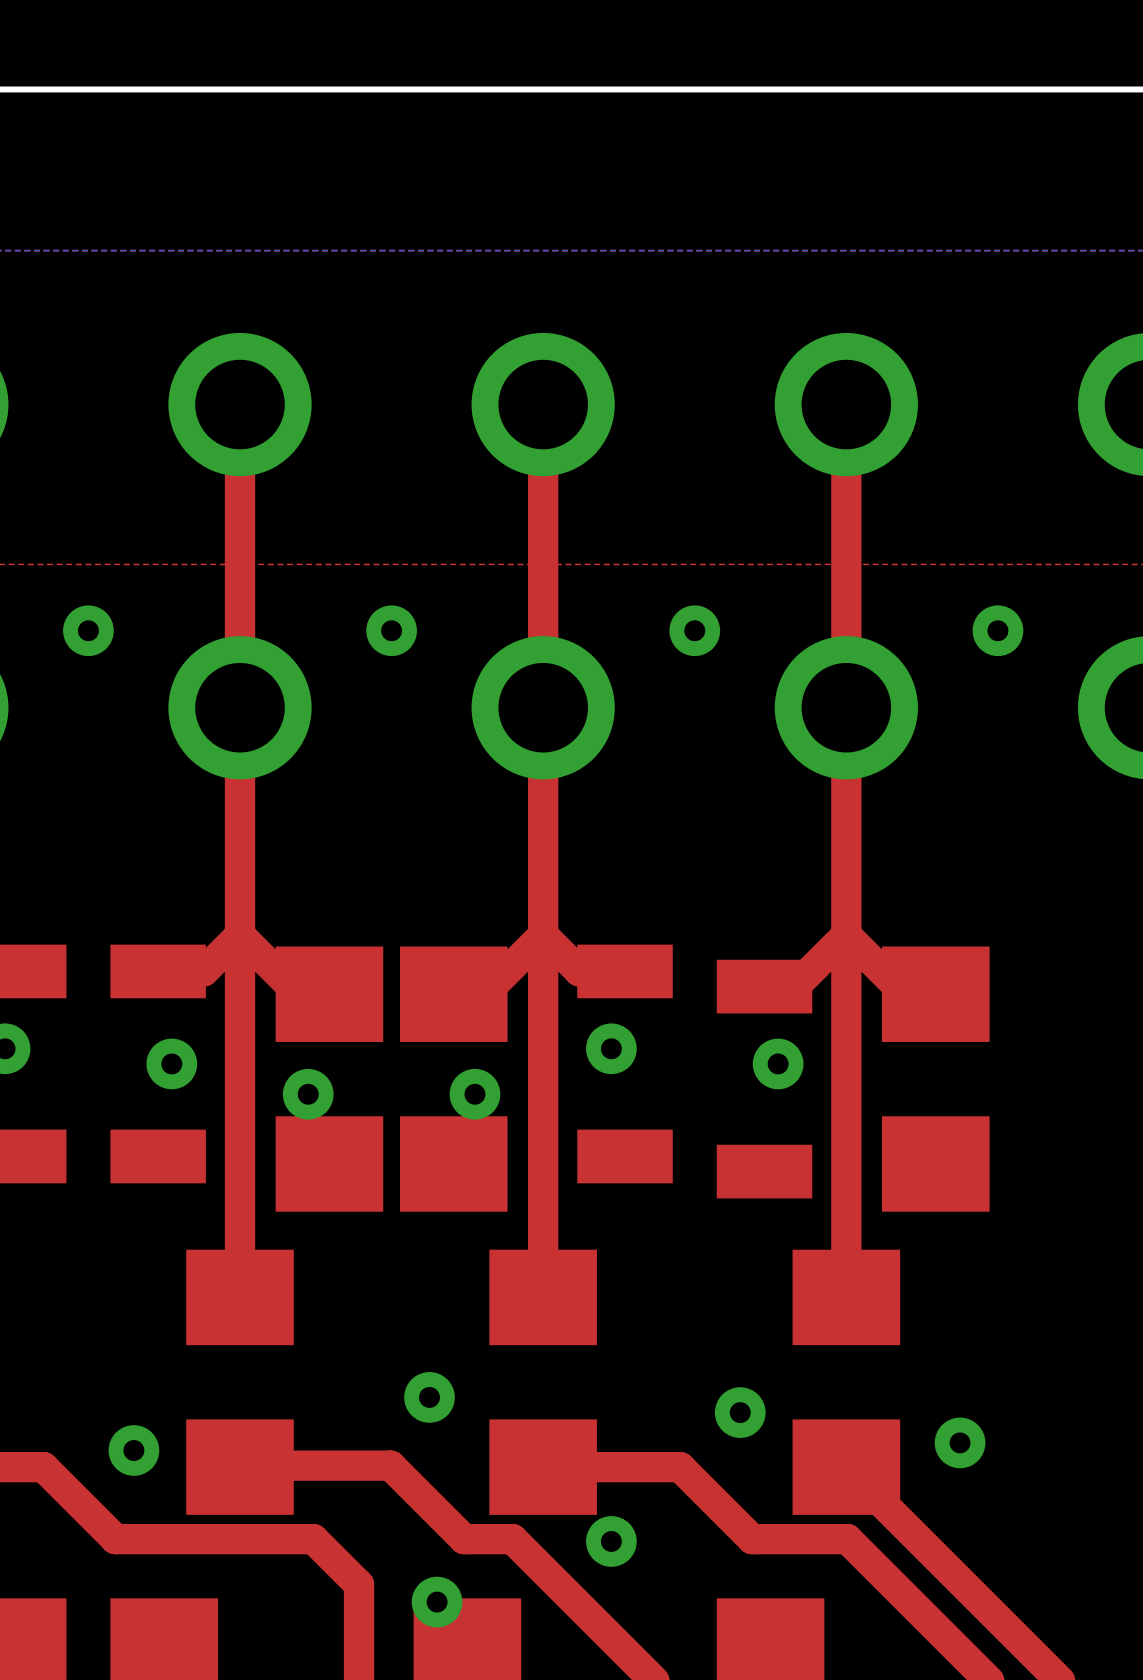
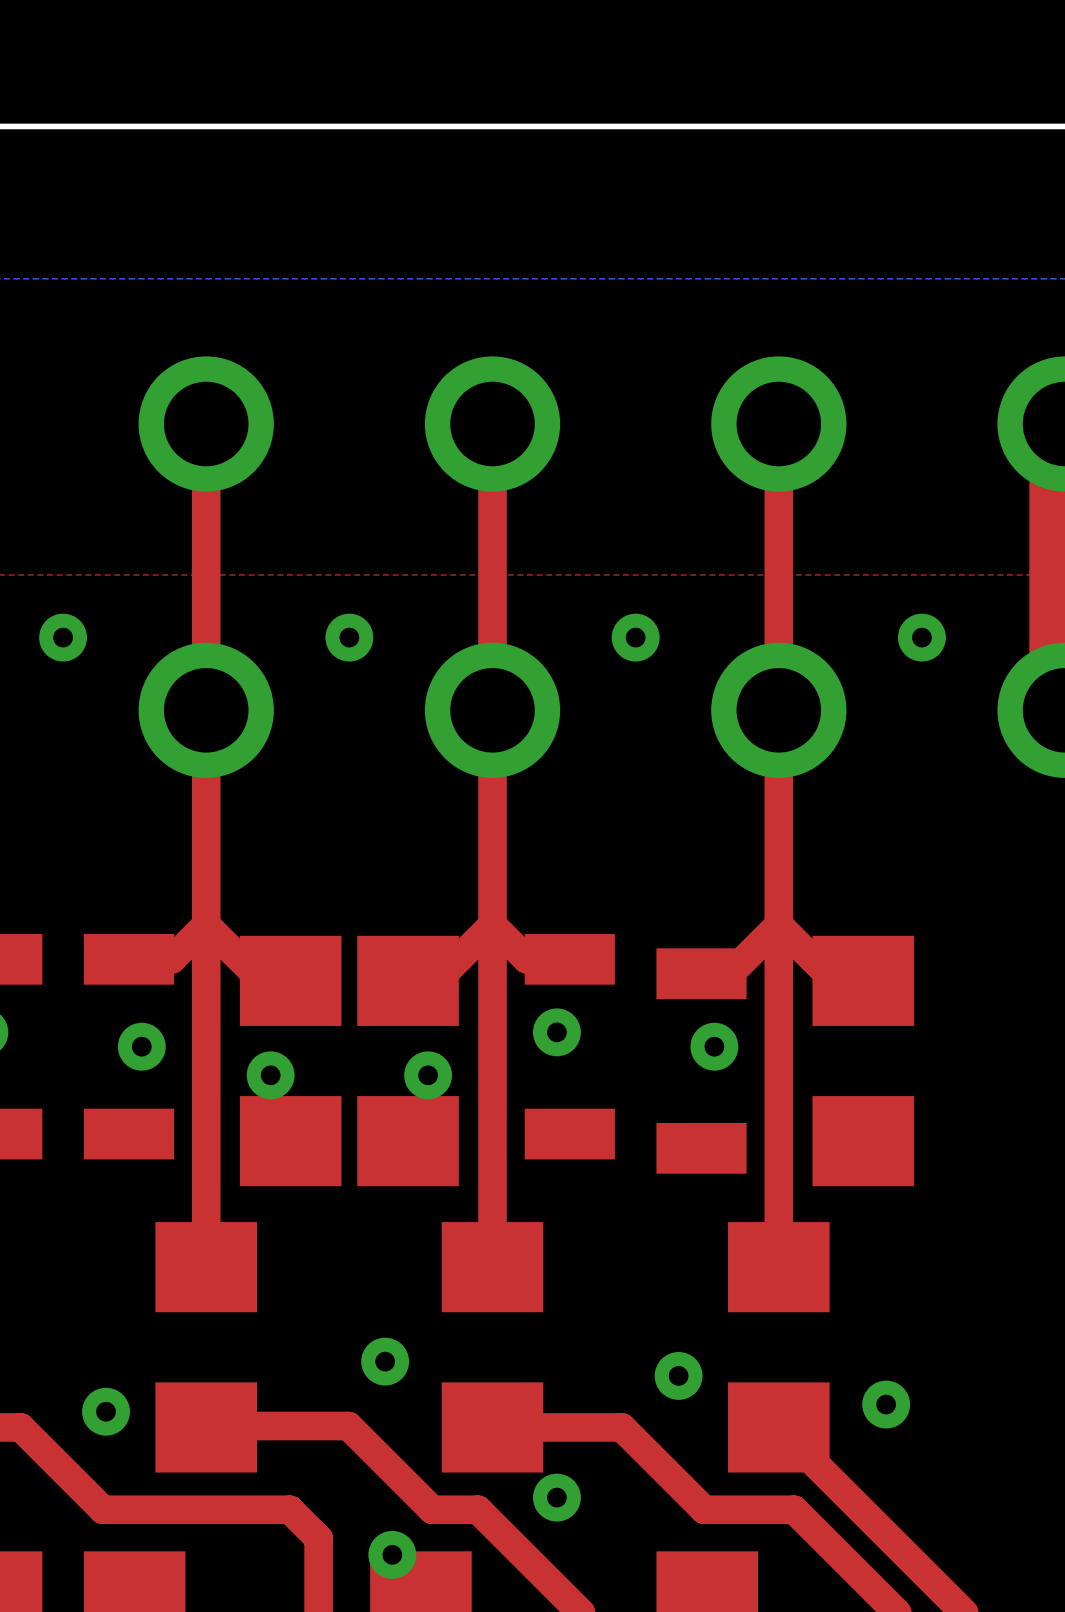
top track: (115, 1539) (313, 1539) (328, 1554) -> (88, 1495) (102, 1509) (289, 1509)
top track: (464, 1539) (512, 1539) (527, 1554) -> (417, 1495) (432, 1509) (477, 1509)
top track: (752, 1539) (847, 1539) (862, 1554) -> (689, 1495) (704, 1509) (794, 1509)

